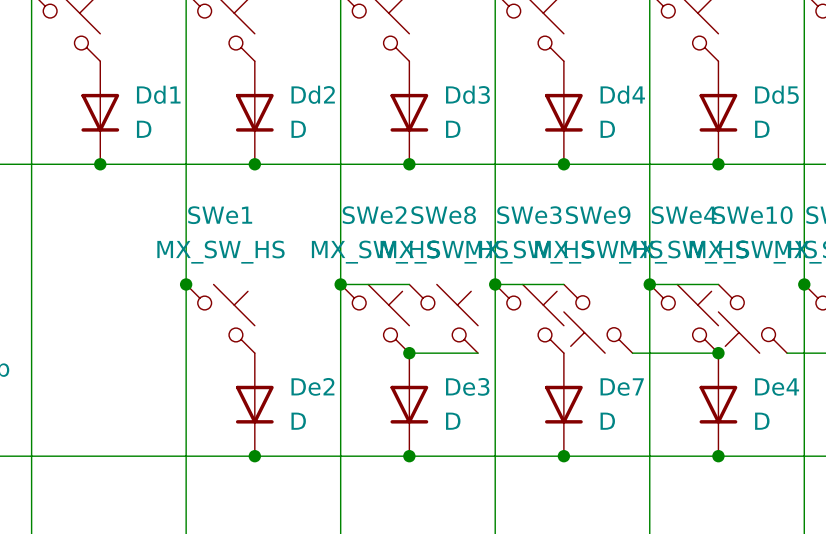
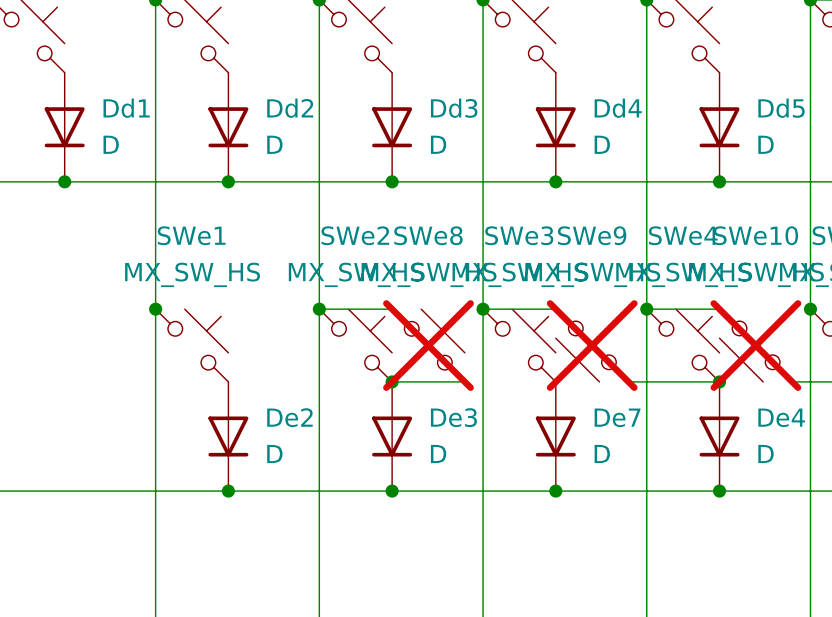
SWe8 do-not-place cross: none -> (428, 345)
SWe9 do-not-place cross: none -> (592, 345)
SWe10 do-not-place cross: none -> (755, 345)

